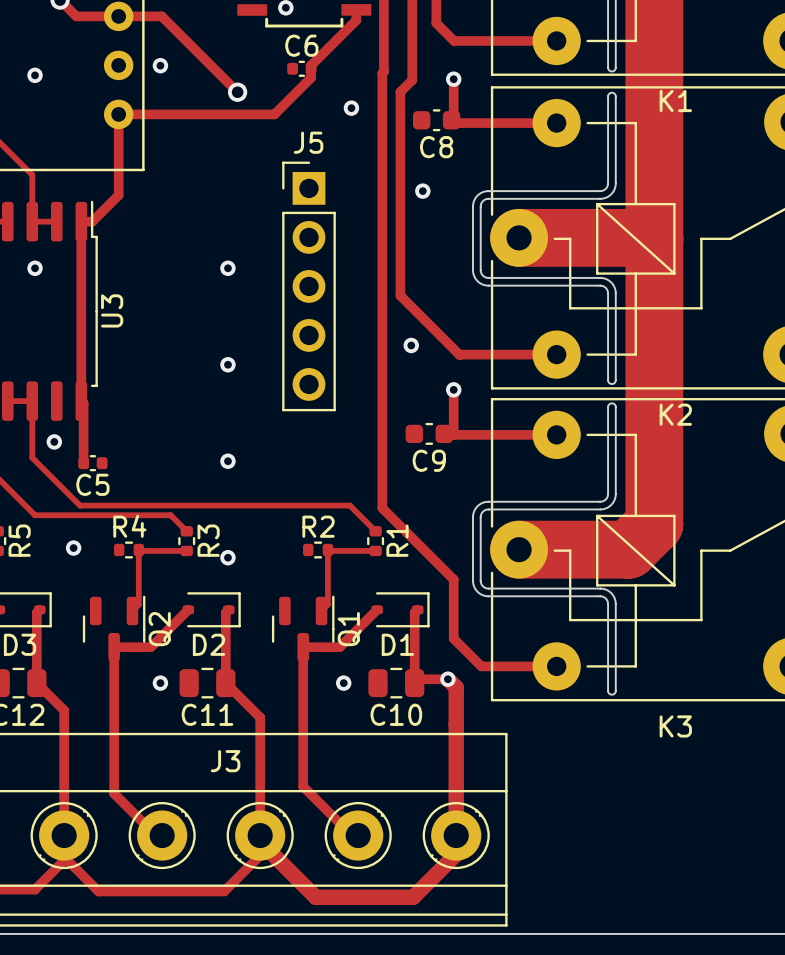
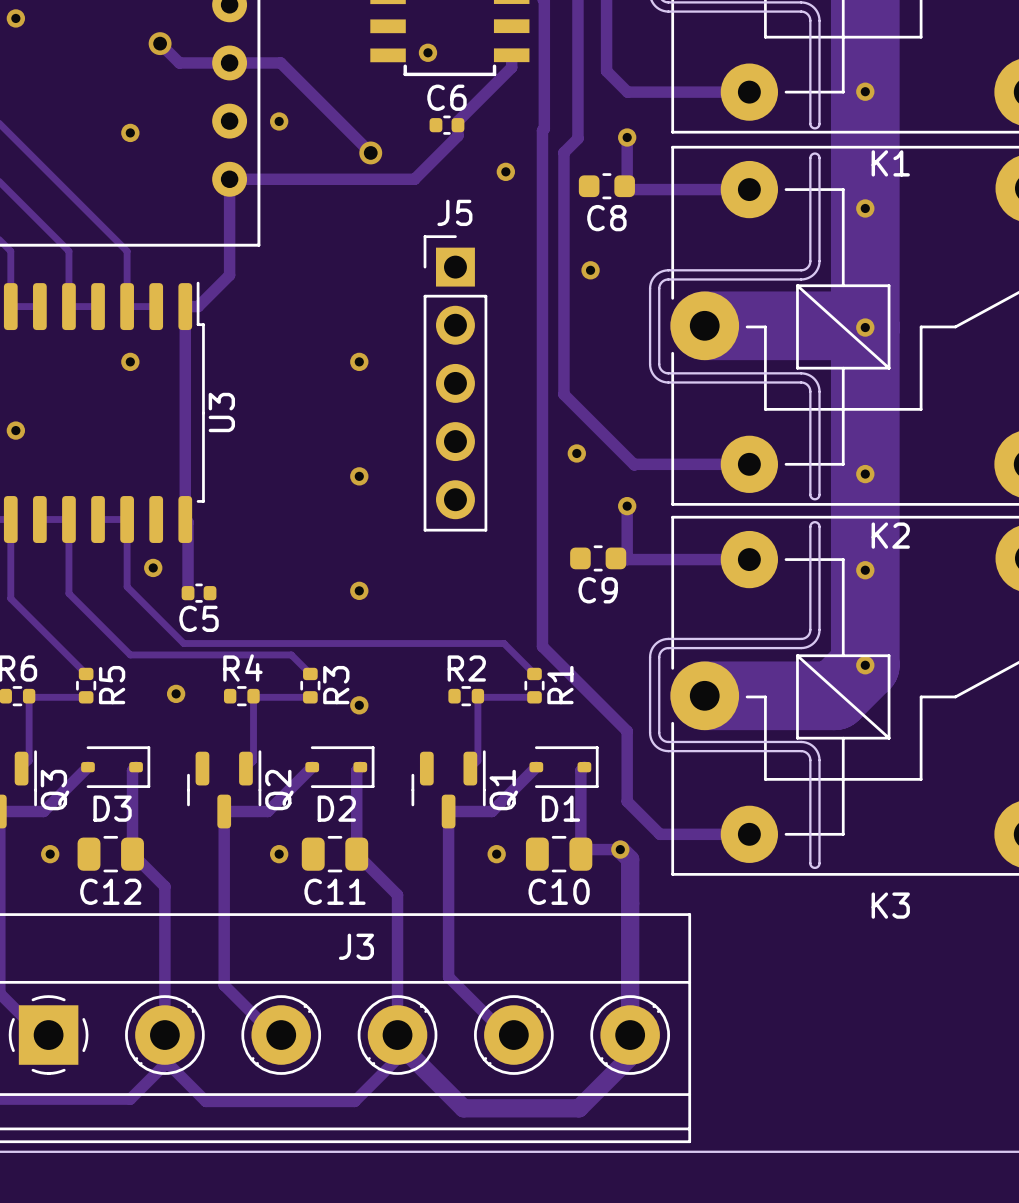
via: none -> (865, 91)
via: none -> (865, 208)
via: none -> (865, 327)
via: none -> (865, 474)
via: none -> (865, 570)
via: none -> (865, 665)

